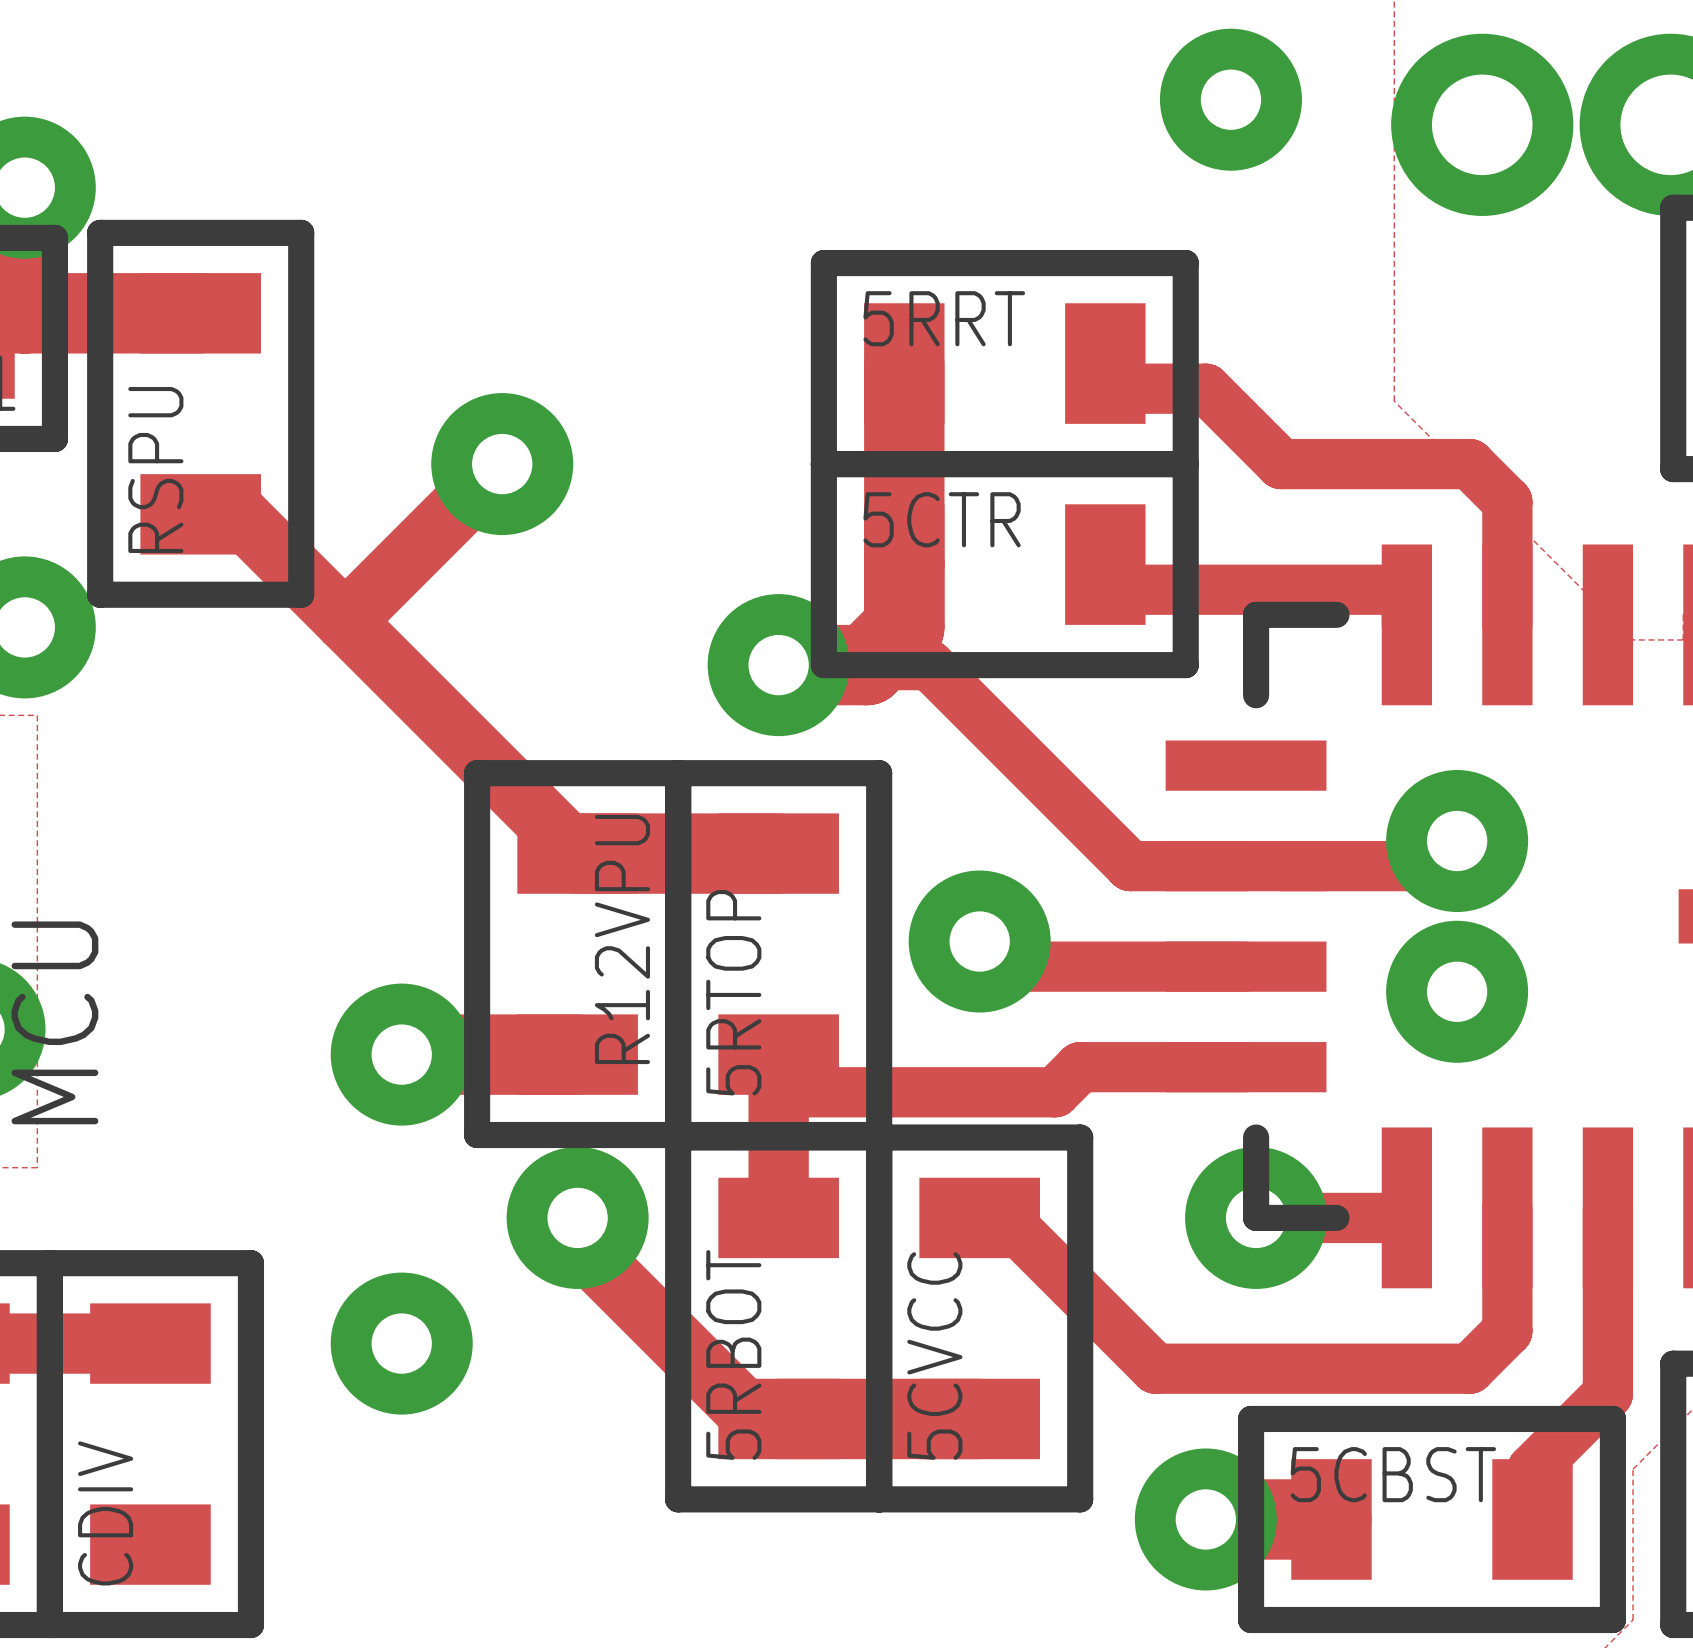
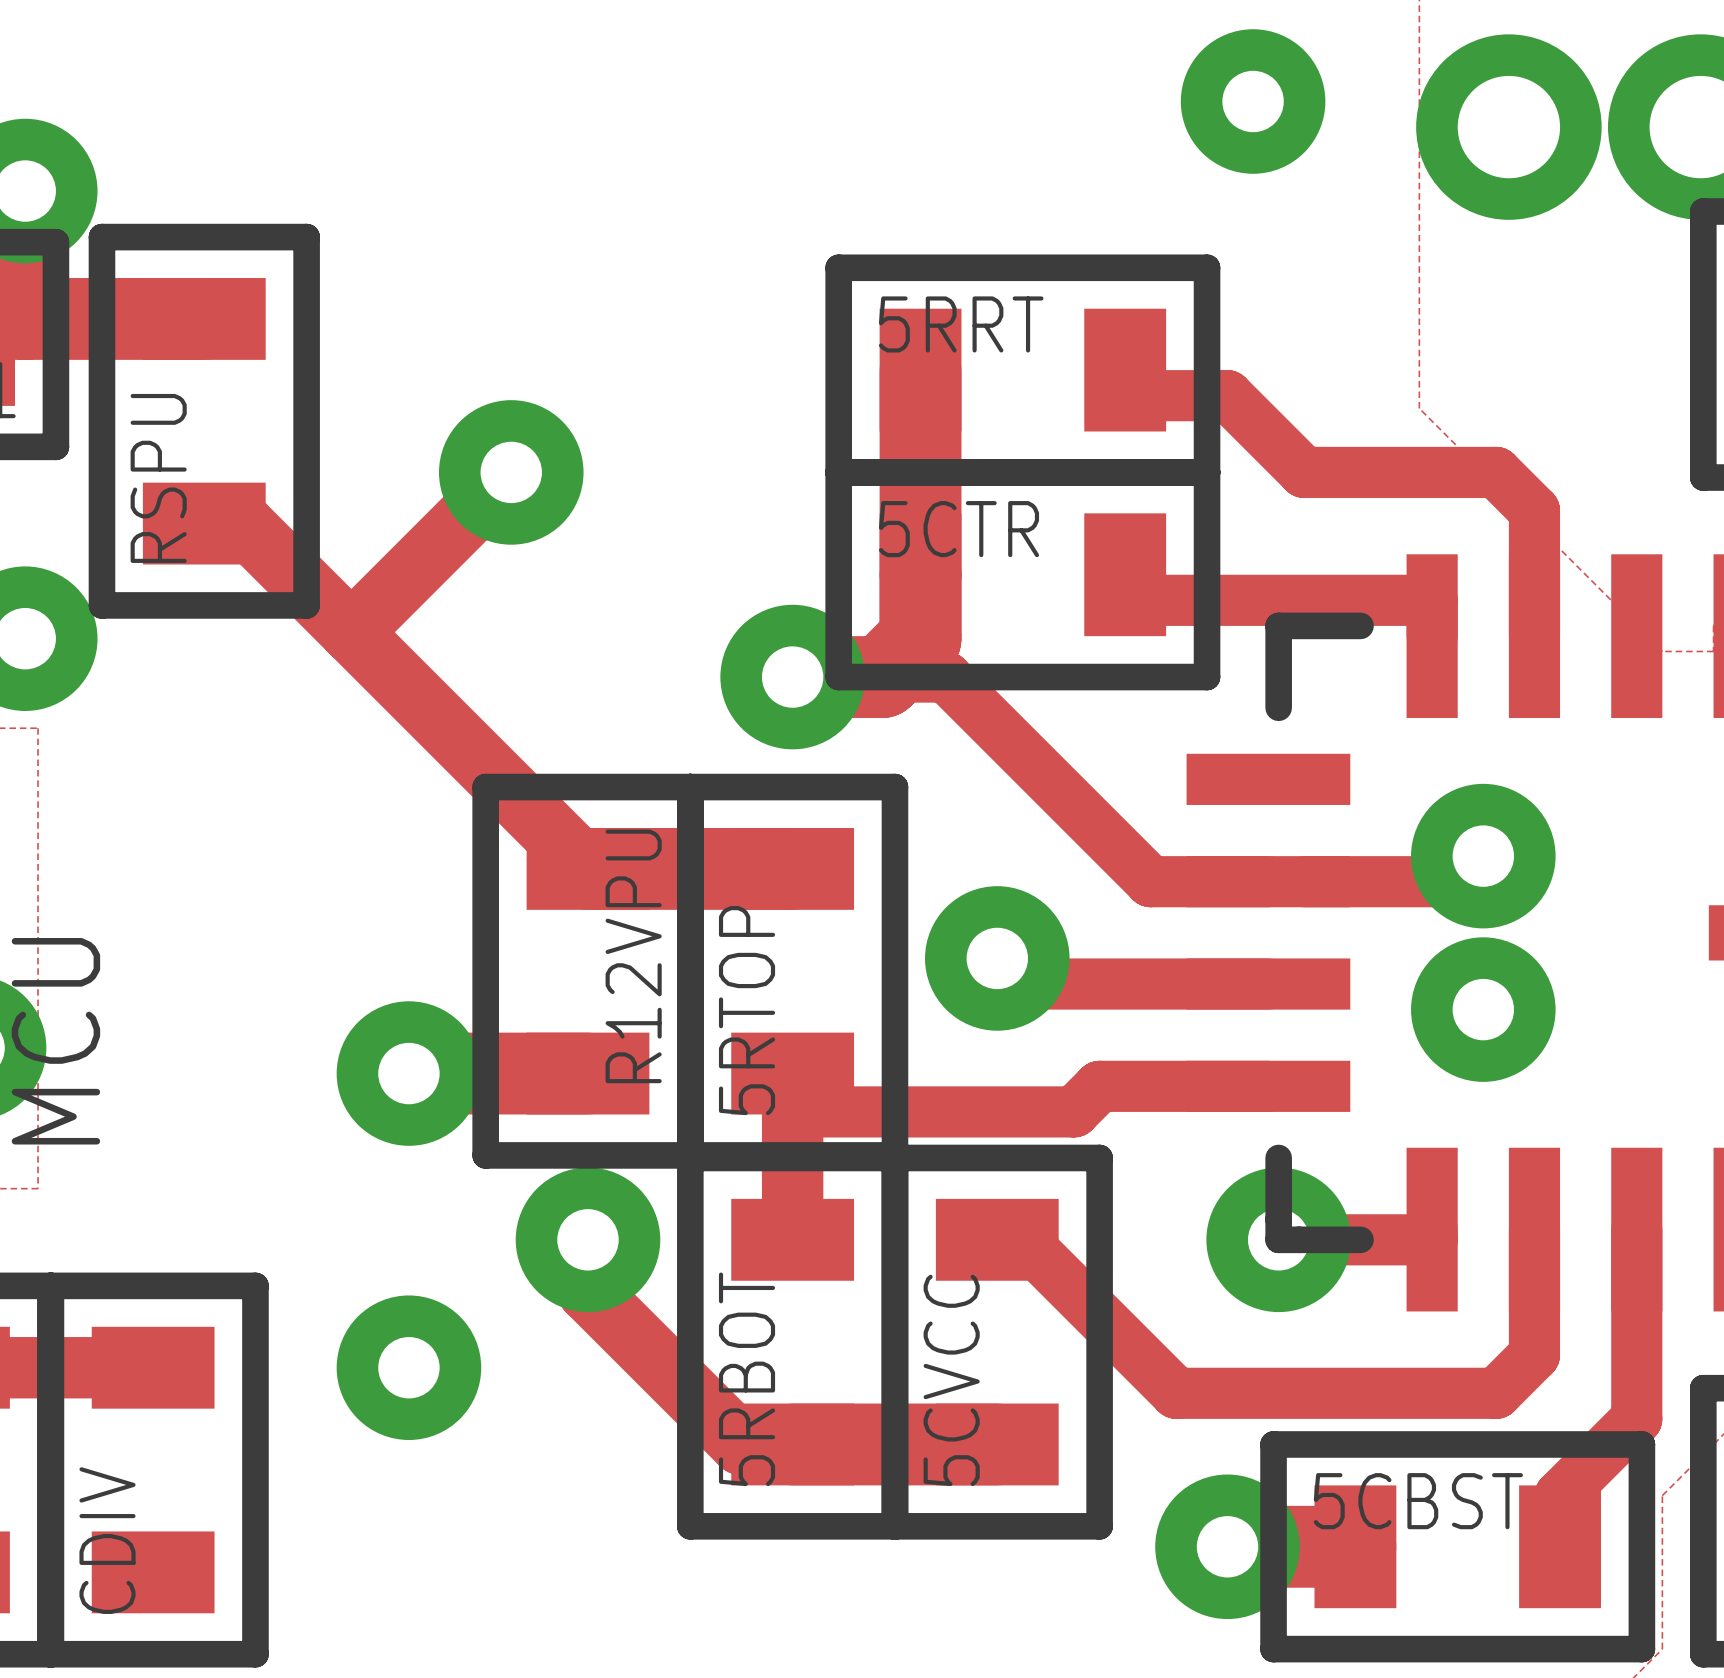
track: (577, 1243) (753, 1418) -> (588, 1265) (588, 1290) (741, 1444) (767, 1444)

